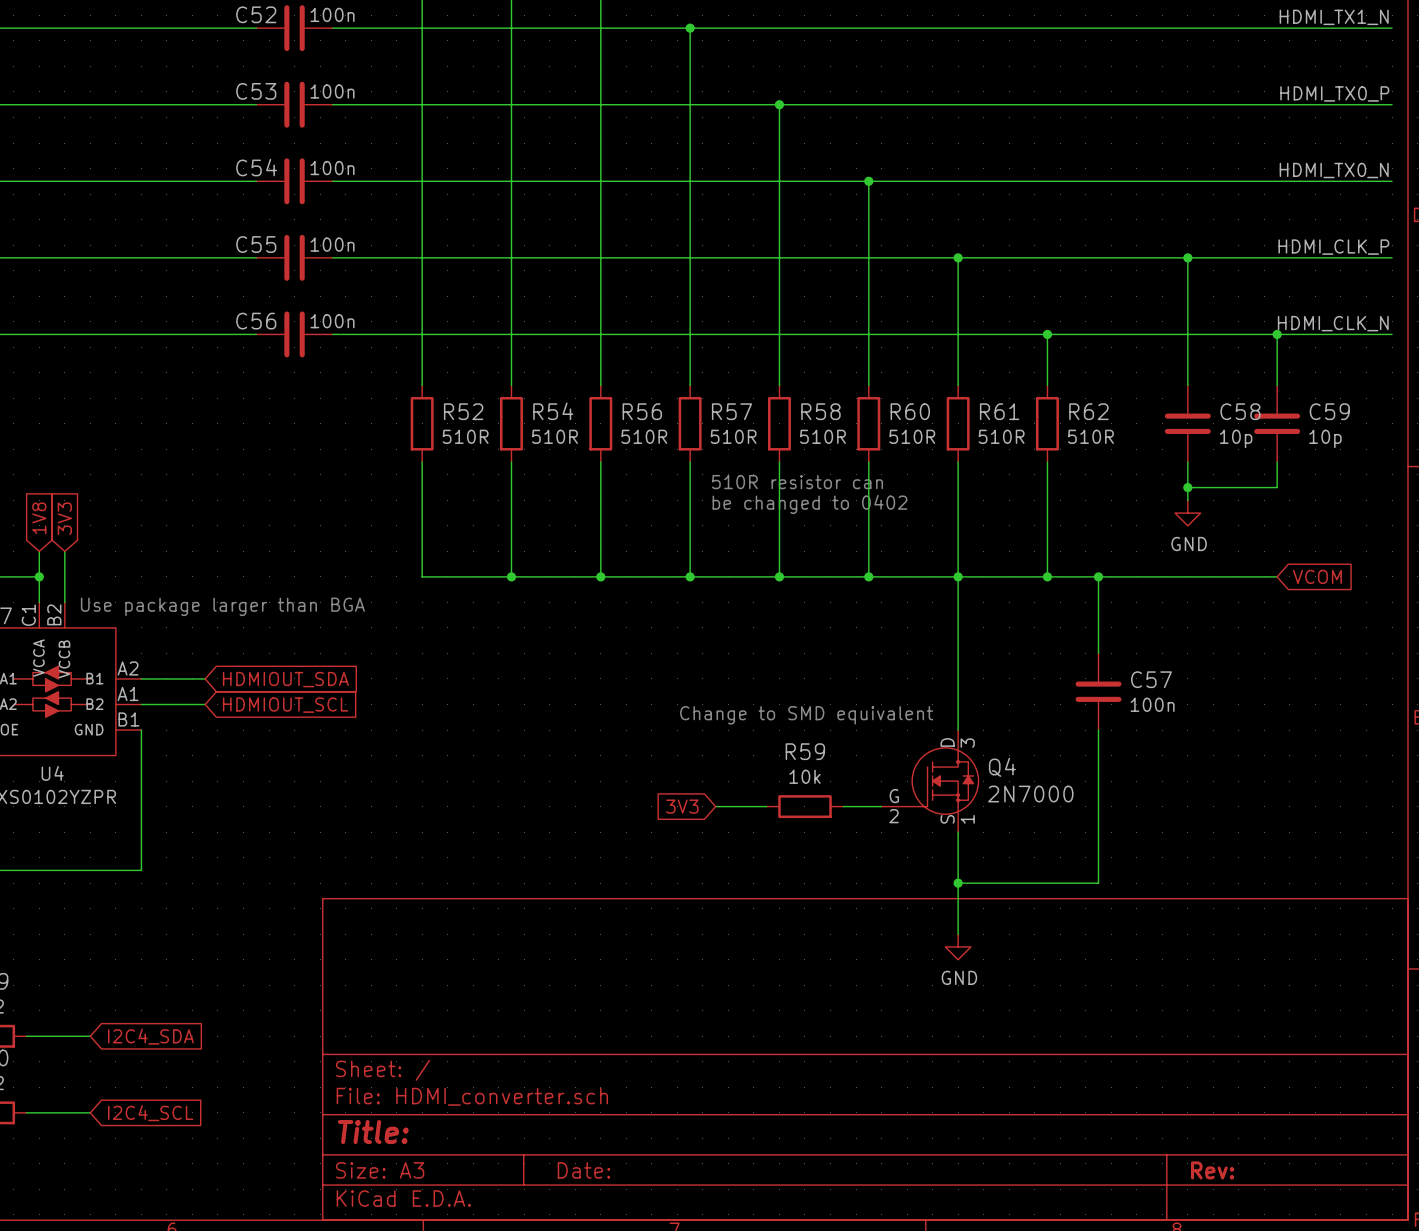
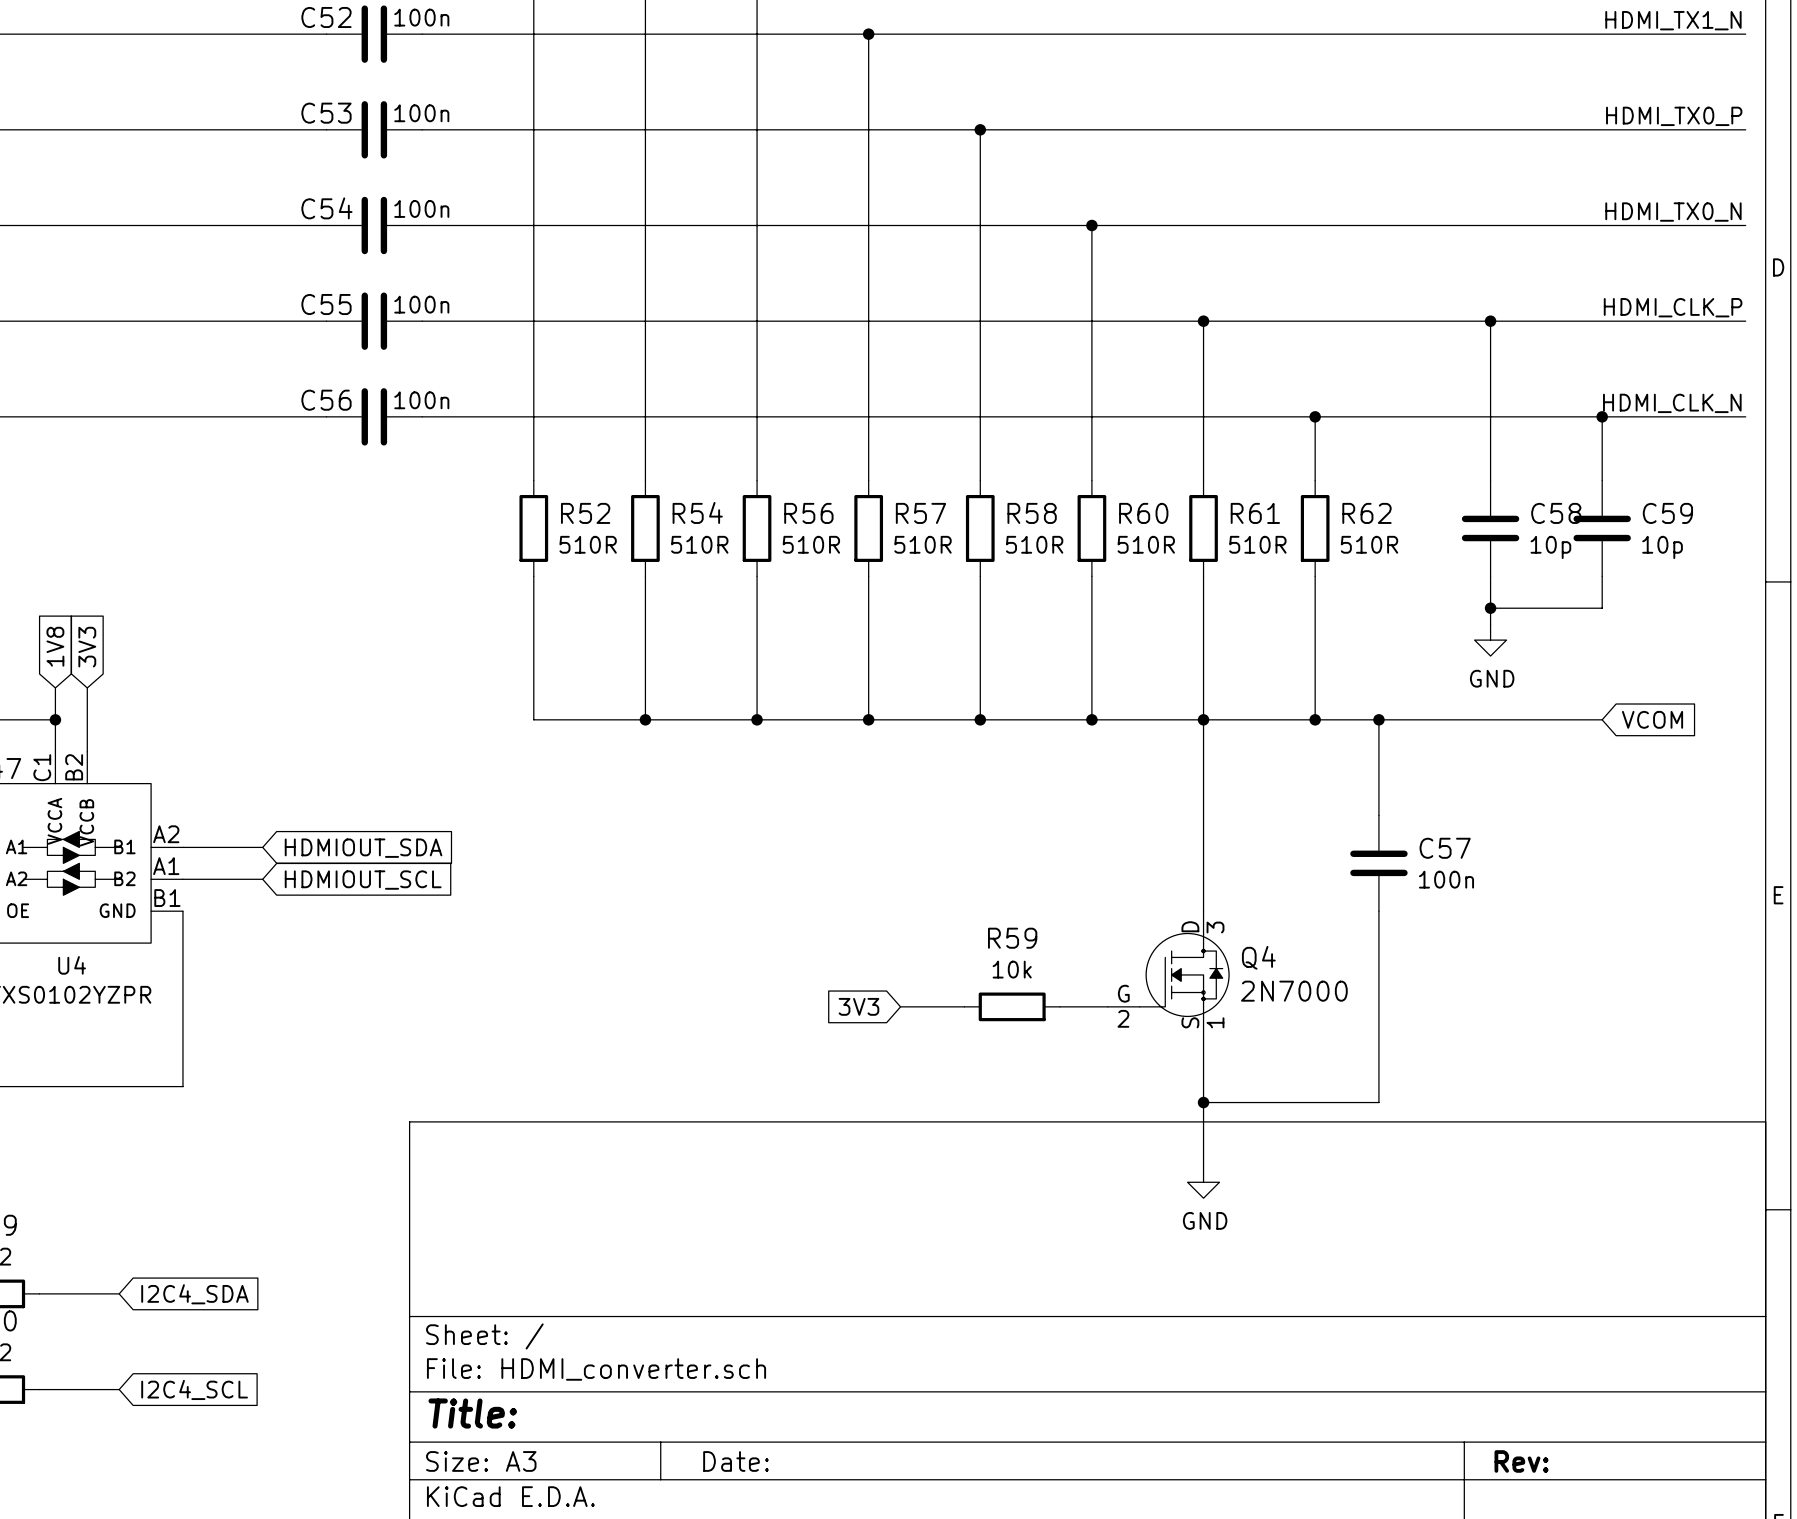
text: 510R resistor can (797, 482) -> none
text: be changed to 0402 (809, 504) -> none
text: Use package larger than BGA (222, 606) -> none
text: Change to SMD equivalent (806, 715) -> none

